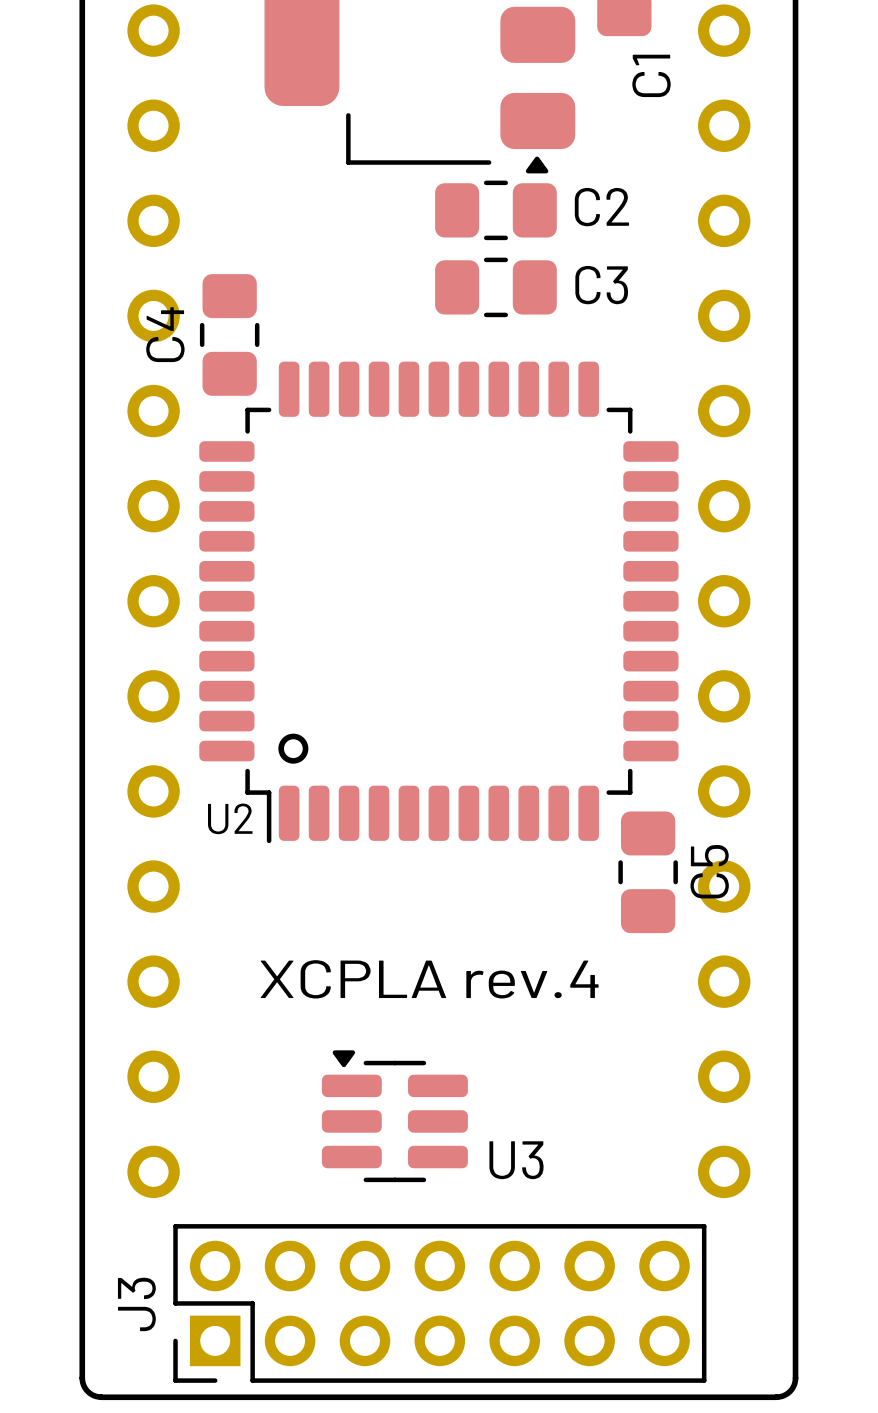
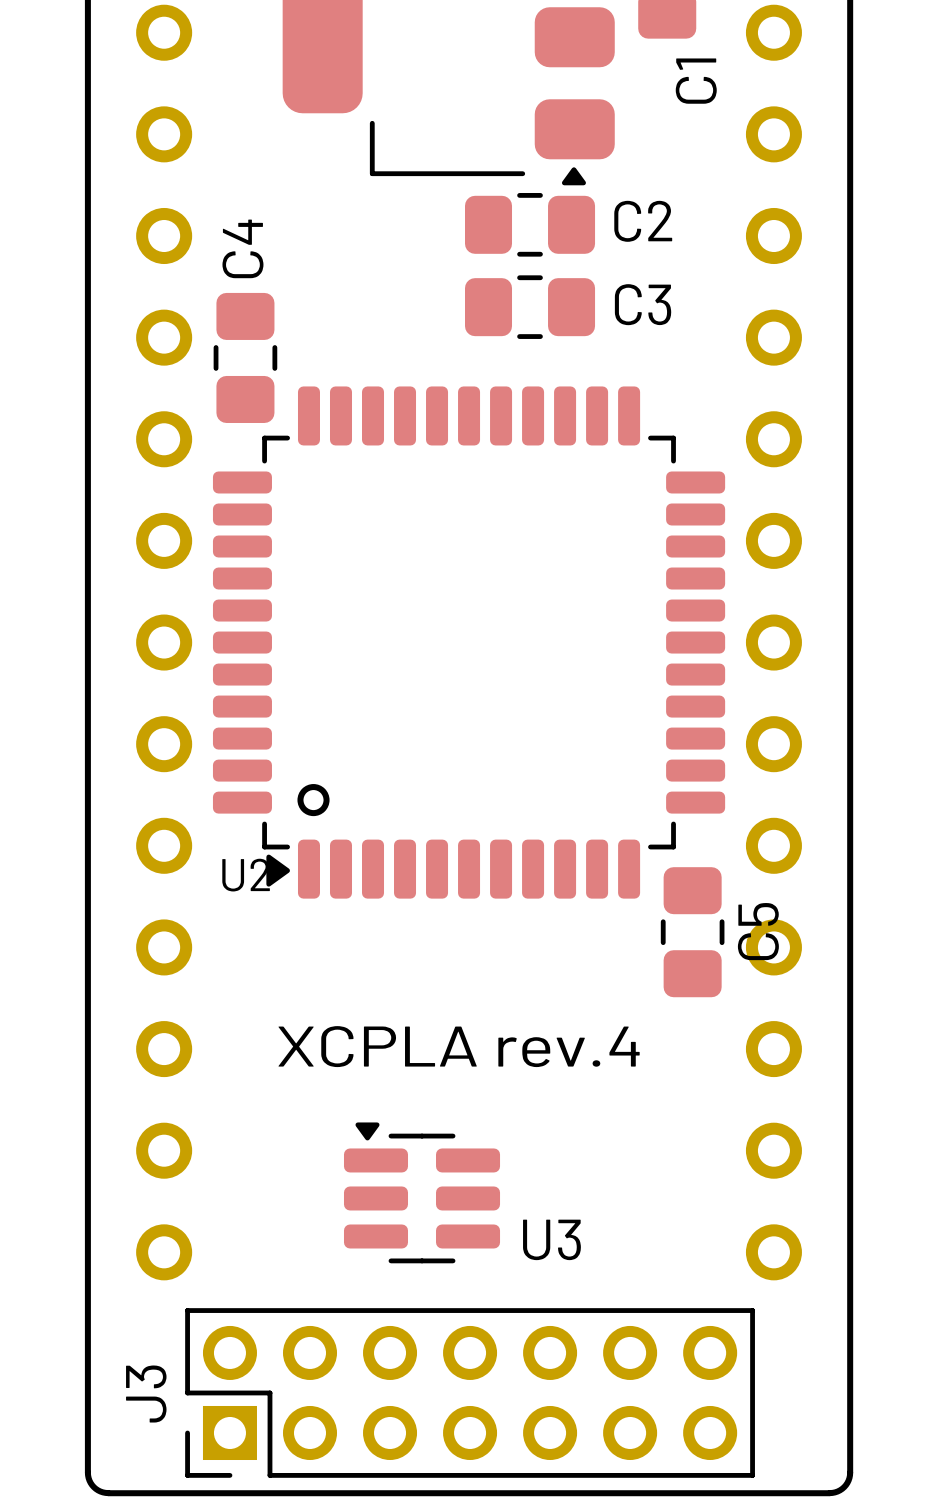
C4 name position: C4 (165, 334) -> C4 (242, 248)
U2 footprint: [199, 361, 679, 844] -> [212, 386, 726, 899]

